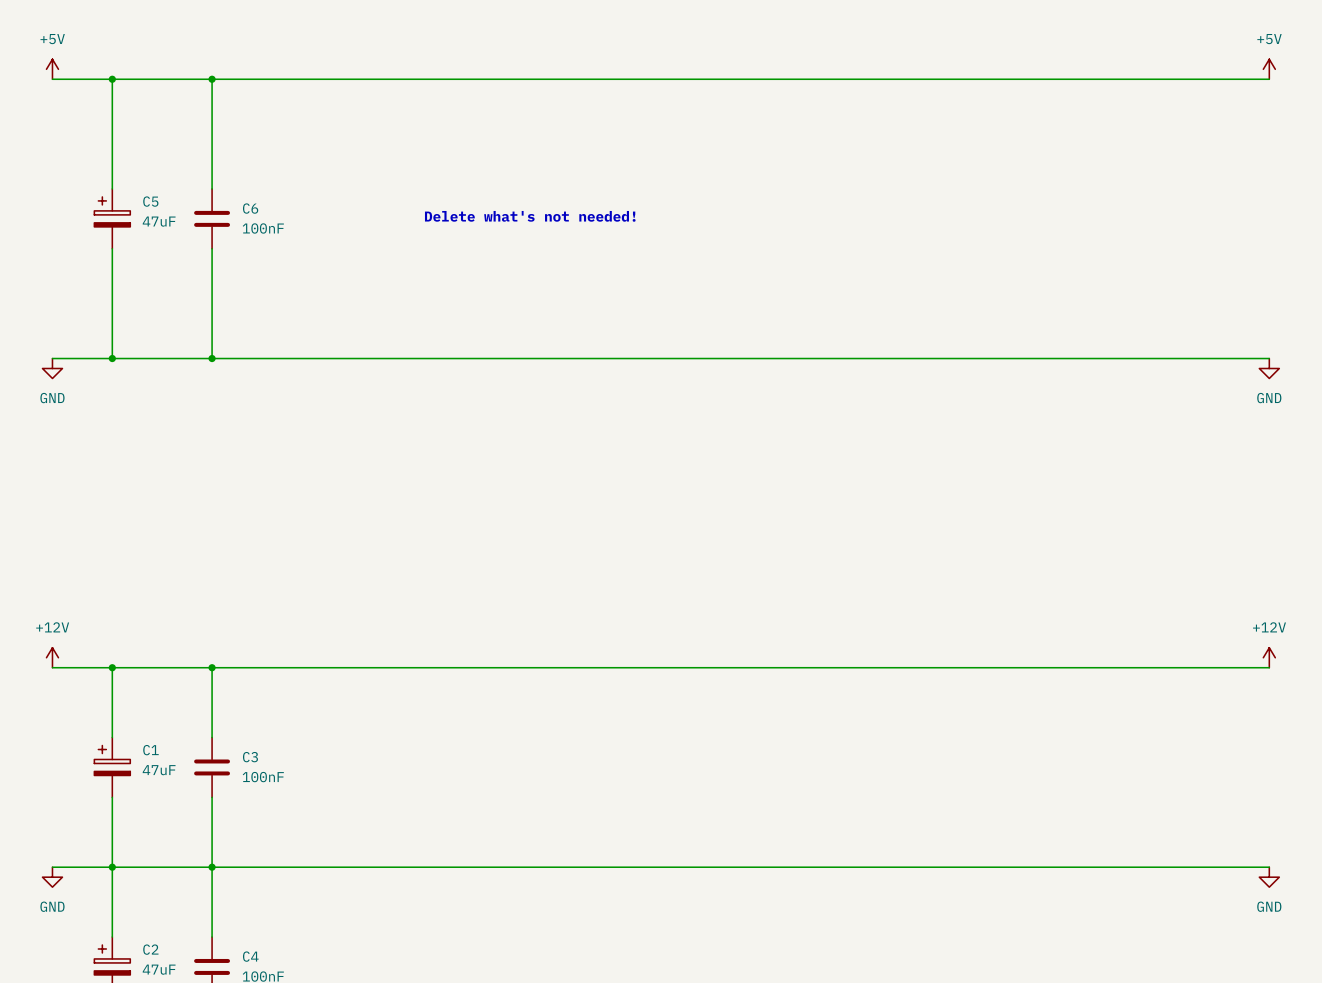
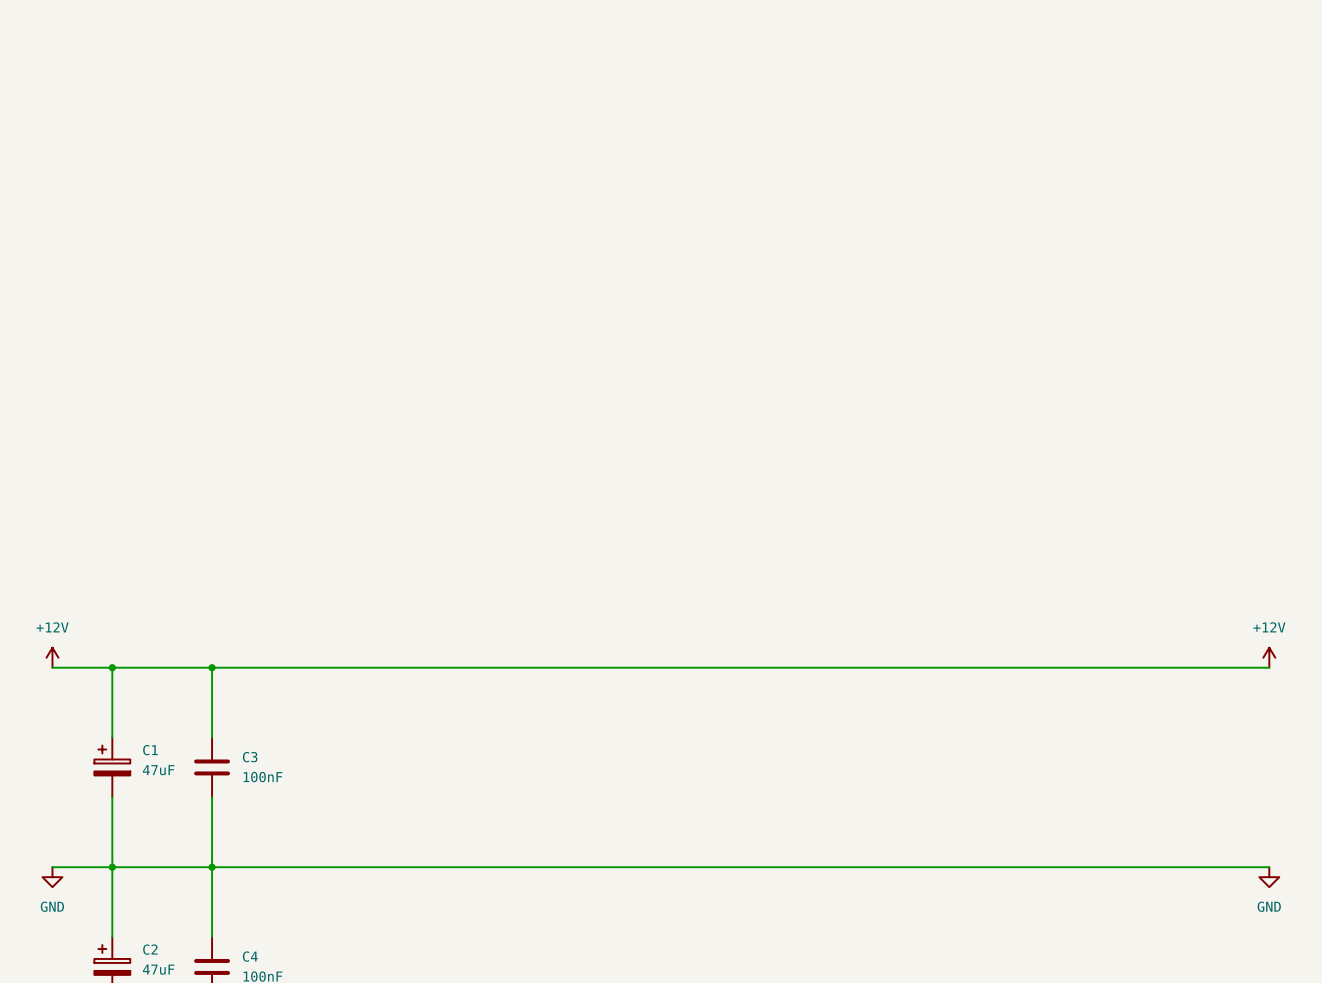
power symbol: +5V (52, 69) -> none
power symbol: +5V (1269, 69) -> none
wire: (52, 79) (1269, 79) -> none
wire: (112, 79) (112, 188) -> none
junction: (112, 79) -> none
wire: (212, 79) (212, 188) -> none
junction: (212, 79) -> none
text: Delete what's not needed! (530, 216) -> none
C5: 47uF (112, 218) -> none
C6: 100nF (212, 218) -> none
wire: (112, 248) (112, 358) -> none
wire: (212, 248) (212, 358) -> none
wire: (52, 358) (1269, 358) -> none
junction: (112, 358) -> none
junction: (212, 358) -> none
power symbol: GND (52, 368) -> none
power symbol: GND (1269, 368) -> none

